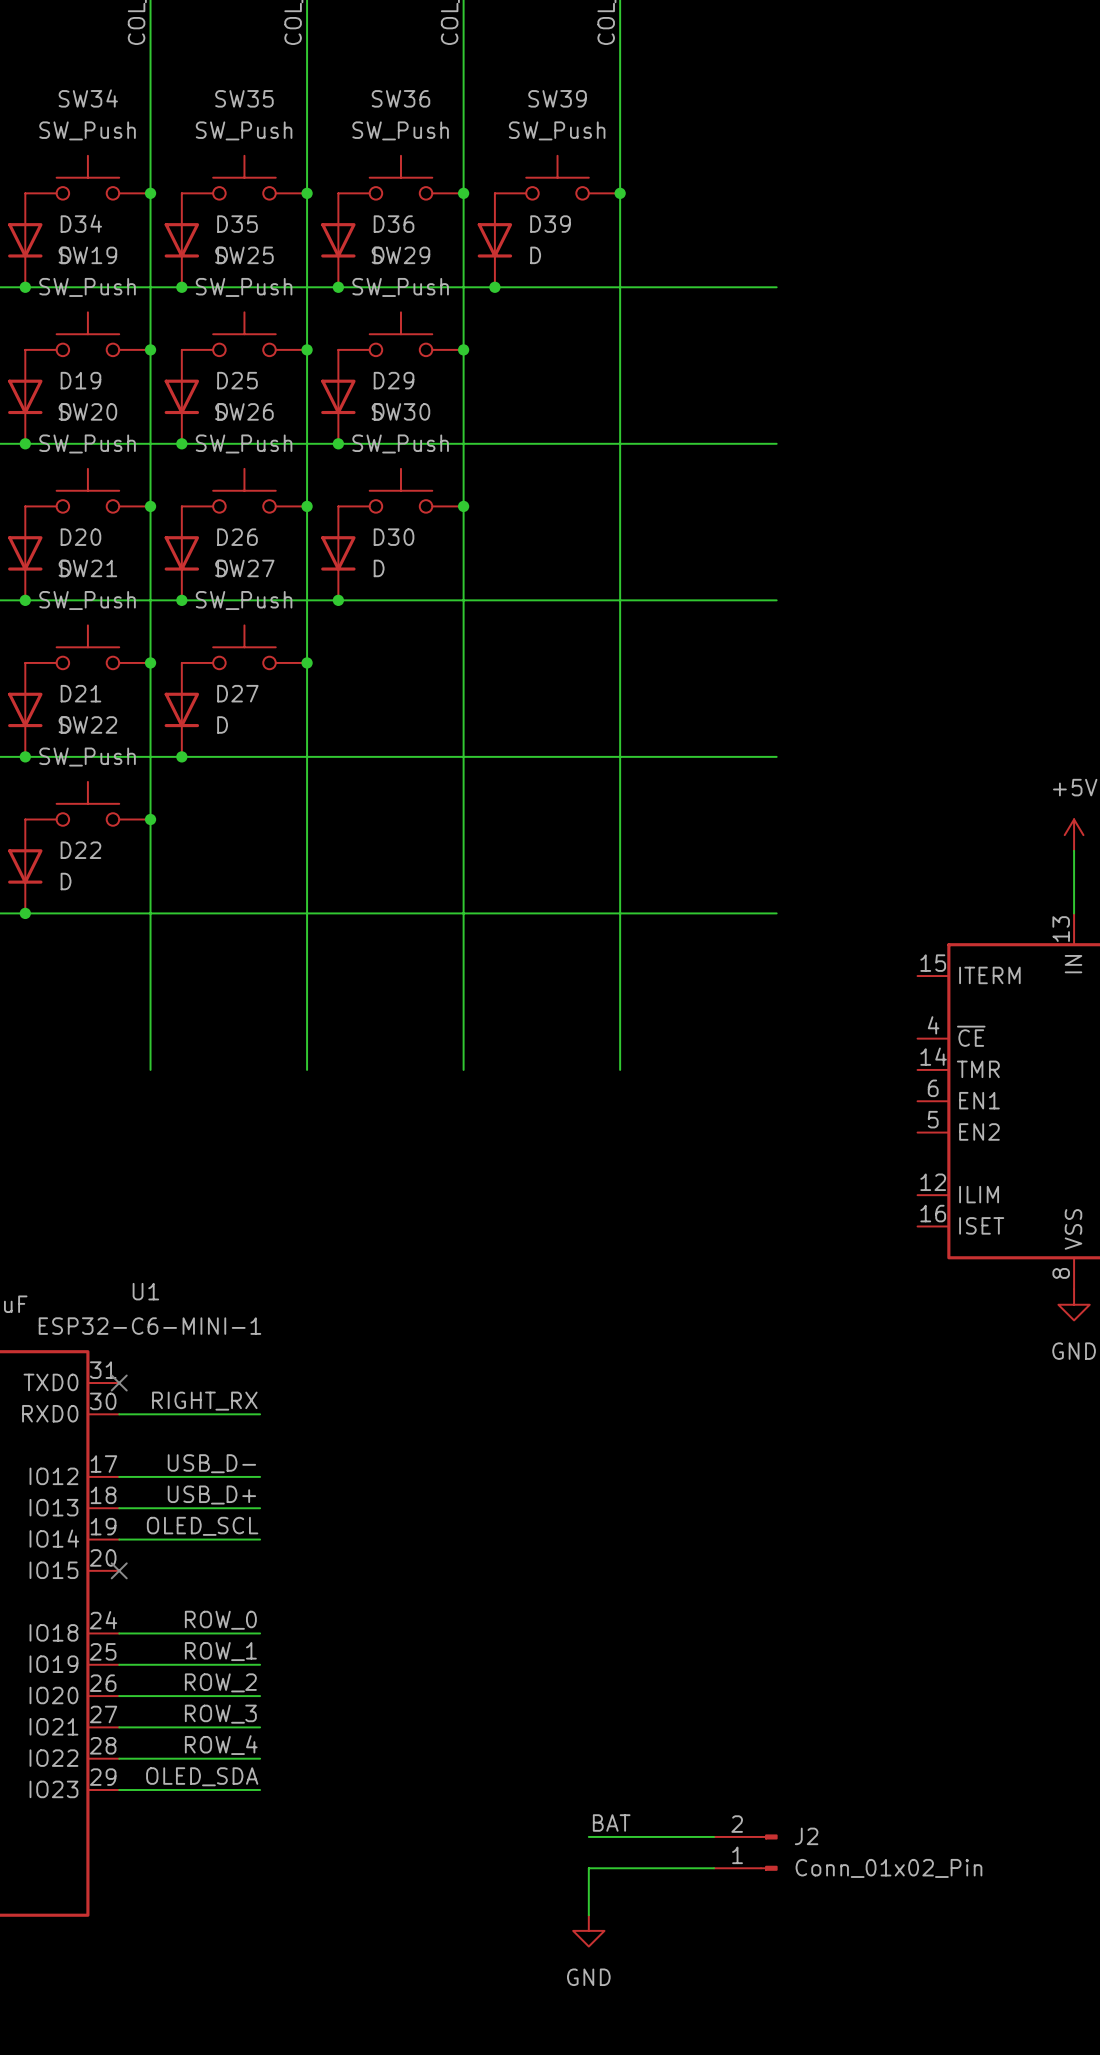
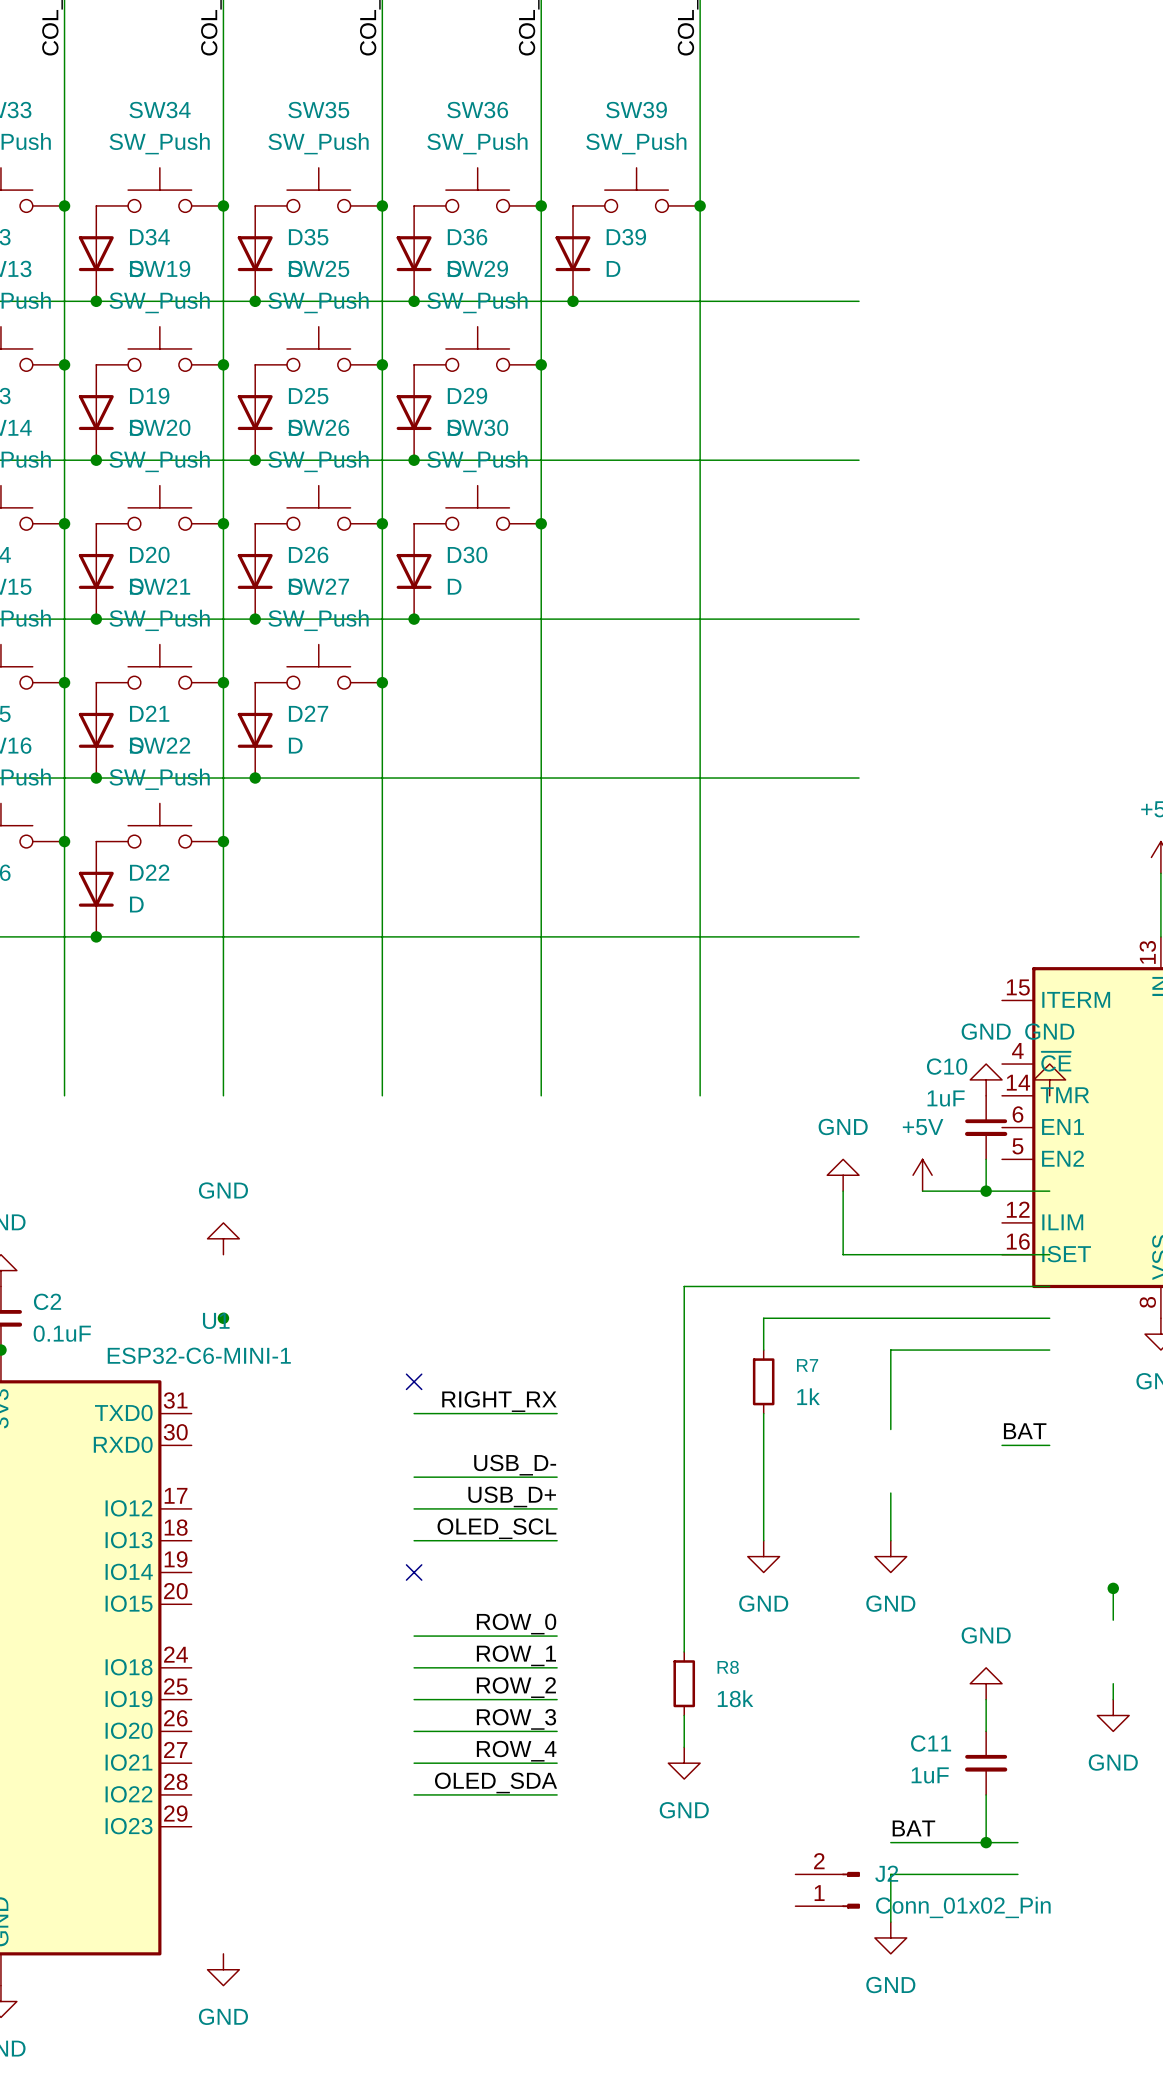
power symbol: none -> GND (986, 1079)
power symbol: none -> GND (1049, 1079)
C10: none -> 1uF (986, 1127)
wire: none -> (986, 1159) (986, 1191)
power symbol: none -> GND (843, 1175)
power symbol: none -> +5V (922, 1175)
wire: none -> (843, 1191) (843, 1254) (1049, 1254)
wire: none -> (922, 1191) (1049, 1191)
junction: none -> (986, 1191)
power symbol: none -> GND (223, 1238)
wire: none -> (1049, 1286) (684, 1286) (684, 1651)
junction: none -> (223, 1318)
wire: none -> (1049, 1318) (763, 1318) (763, 1350)
wire: none -> (1049, 1350) (890, 1350) (890, 1429)
no-connect mark: none -> (414, 1381)
R7: none -> 1k (763, 1381)
no-connect mark: (119, 1383) -> none
wire: none -> (763, 1413) (763, 1540)
label: none -> BAT (1025, 1431)
label position: RIGHT_RX (204, 1401) -> RIGHT_RX (499, 1401)
wire: (119, 1414) (260, 1414) -> (414, 1413) (557, 1413)
wire: none -> (1002, 1445) (1049, 1445)
wire: none -> (890, 1493) (890, 1540)
label position: USB_D- (211, 1463) -> USB_D- (515, 1465)
wire: (119, 1476) (260, 1476) -> (414, 1477) (557, 1477)
label position: USB_D+ (211, 1495) -> USB_D+ (512, 1496)
wire: (119, 1508) (260, 1508) -> (414, 1508) (557, 1508)
power symbol: none -> GND (763, 1556)
power symbol: none -> GND (890, 1556)
label position: OLED_SCL (202, 1526) -> OLED_SCL (496, 1528)
wire: (119, 1539) (260, 1539) -> (414, 1540) (557, 1540)
no-connect mark: none -> (414, 1572)
wire: none -> (1113, 1588) (1113, 1620)
junction: none -> (1113, 1588)
no-connect mark: (119, 1570) -> none
label position: ROW_0 (220, 1620) -> ROW_0 (516, 1624)
wire: (119, 1633) (260, 1633) -> (414, 1636) (557, 1636)
R8: none -> 18k (684, 1683)
power symbol: none -> GND (986, 1683)
wire: none -> (1113, 1683) (1113, 1699)
label position: ROW_1 (220, 1651) -> ROW_1 (516, 1655)
wire: (119, 1664) (260, 1664) -> (414, 1667) (557, 1667)
wire: none -> (986, 1699) (986, 1731)
wire: none -> (684, 1715) (684, 1747)
power symbol: none -> GND (1113, 1715)
label position: ROW_2 (220, 1682) -> ROW_2 (516, 1687)
wire: (119, 1696) (260, 1696) -> (414, 1699) (557, 1699)
label position: ROW_3 (220, 1714) -> ROW_3 (516, 1719)
wire: (119, 1727) (260, 1727) -> (414, 1731) (557, 1731)
power symbol: none -> GND (684, 1763)
C11: none -> 1uF (986, 1763)
label position: ROW_4 (221, 1745) -> ROW_4 (516, 1751)
wire: (119, 1758) (260, 1758) -> (414, 1763) (557, 1763)
wire: none -> (986, 1794) (986, 1842)
label position: OLED_SDA (202, 1776) -> OLED_SDA (496, 1782)
wire: (119, 1790) (260, 1790) -> (414, 1794) (557, 1794)
junction: none -> (986, 1842)
label position: BAT (611, 1822) -> BAT (913, 1828)
wire: (588, 1836) (714, 1836) -> (890, 1842) (1017, 1842)
wire: (714, 1868) (588, 1868) (588, 1915) -> (1017, 1874) (890, 1874) (890, 1922)
power symbol: none -> GND (890, 1937)
power symbol: none -> GND (223, 1969)
power symbol: GND (588, 1930) -> none

